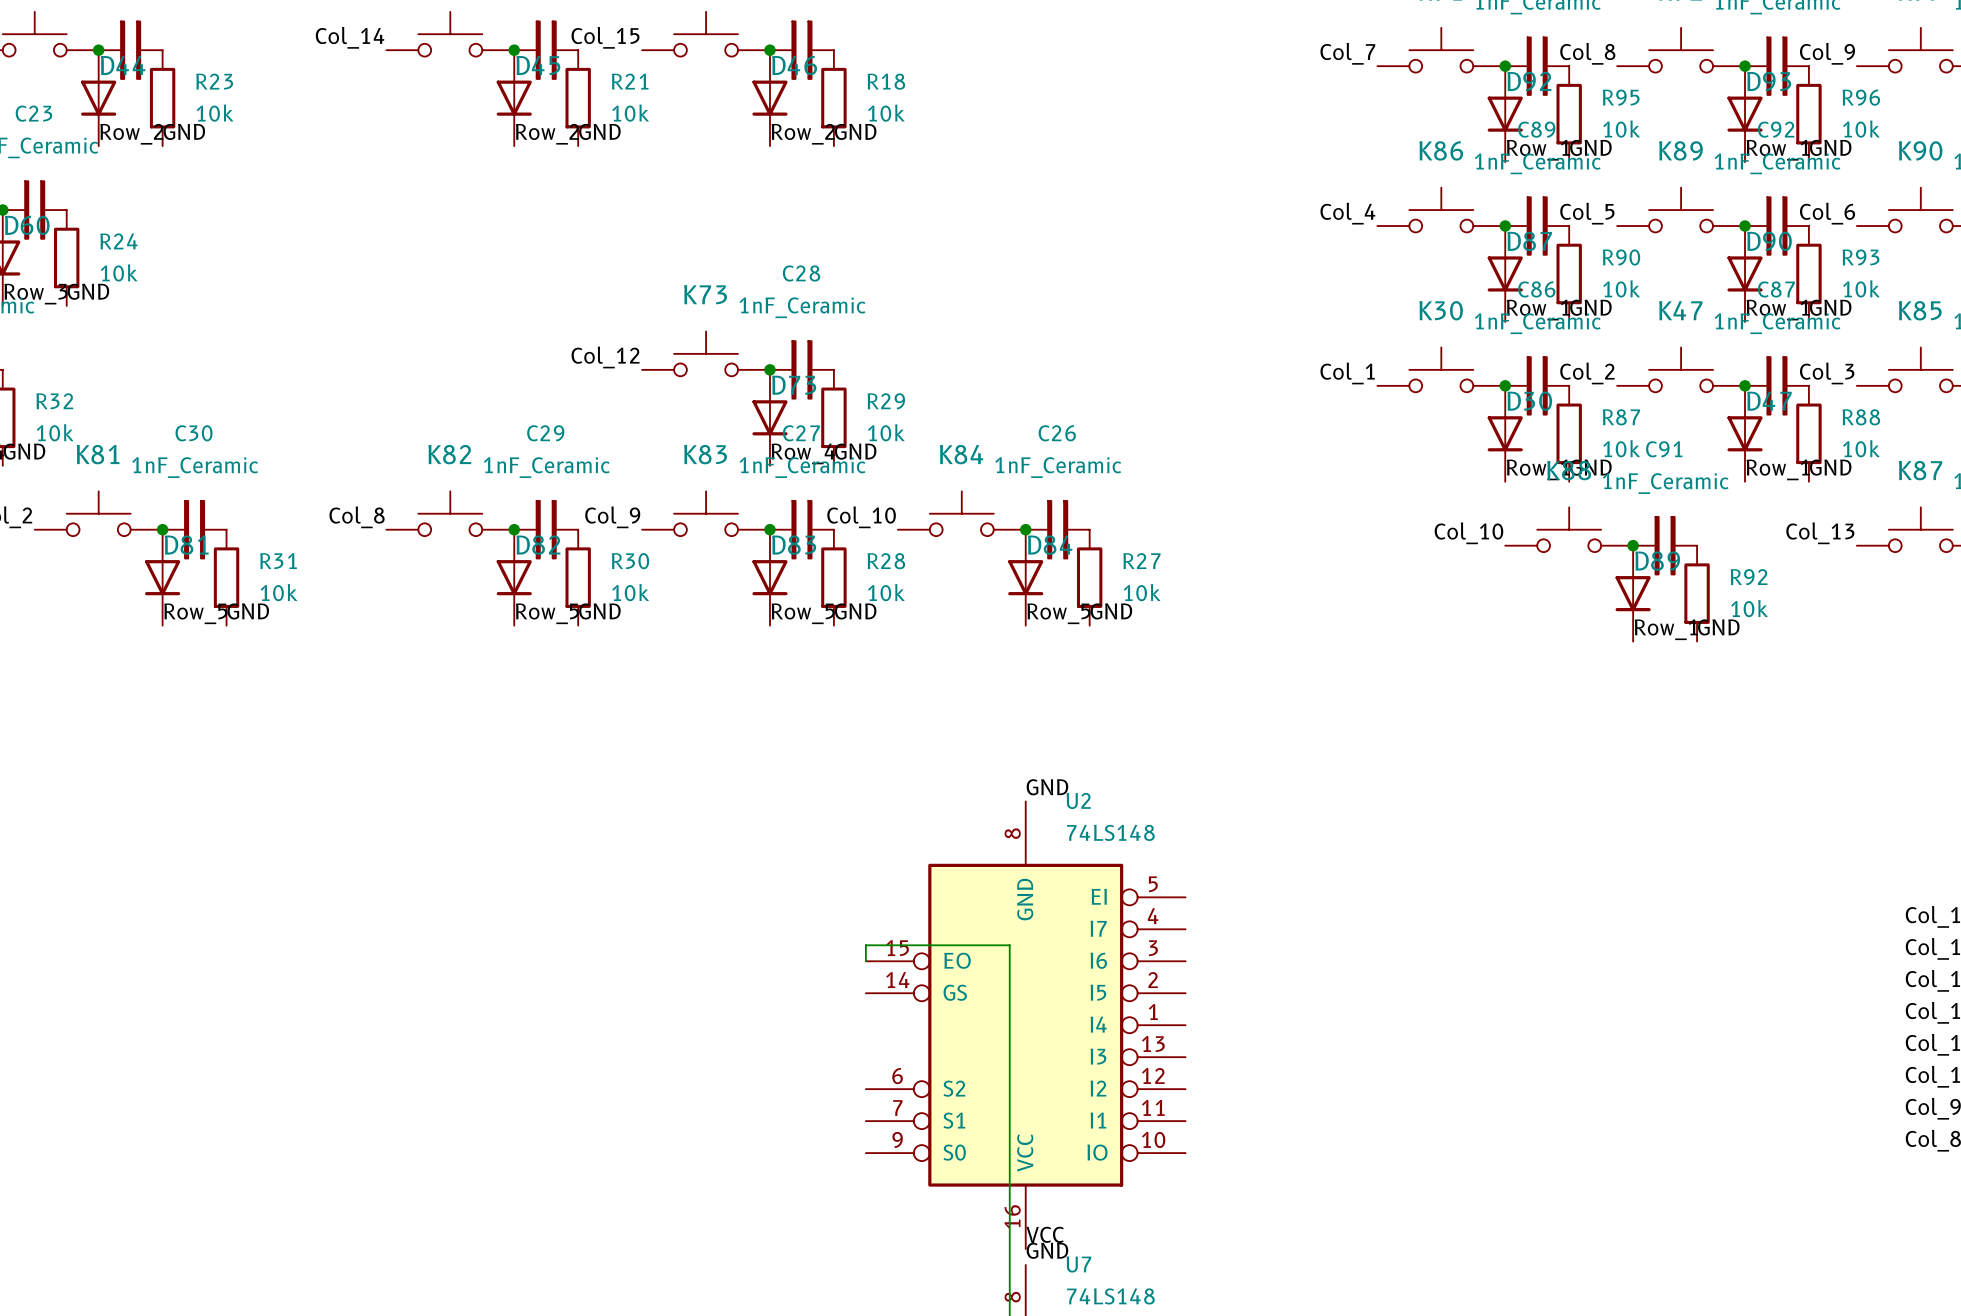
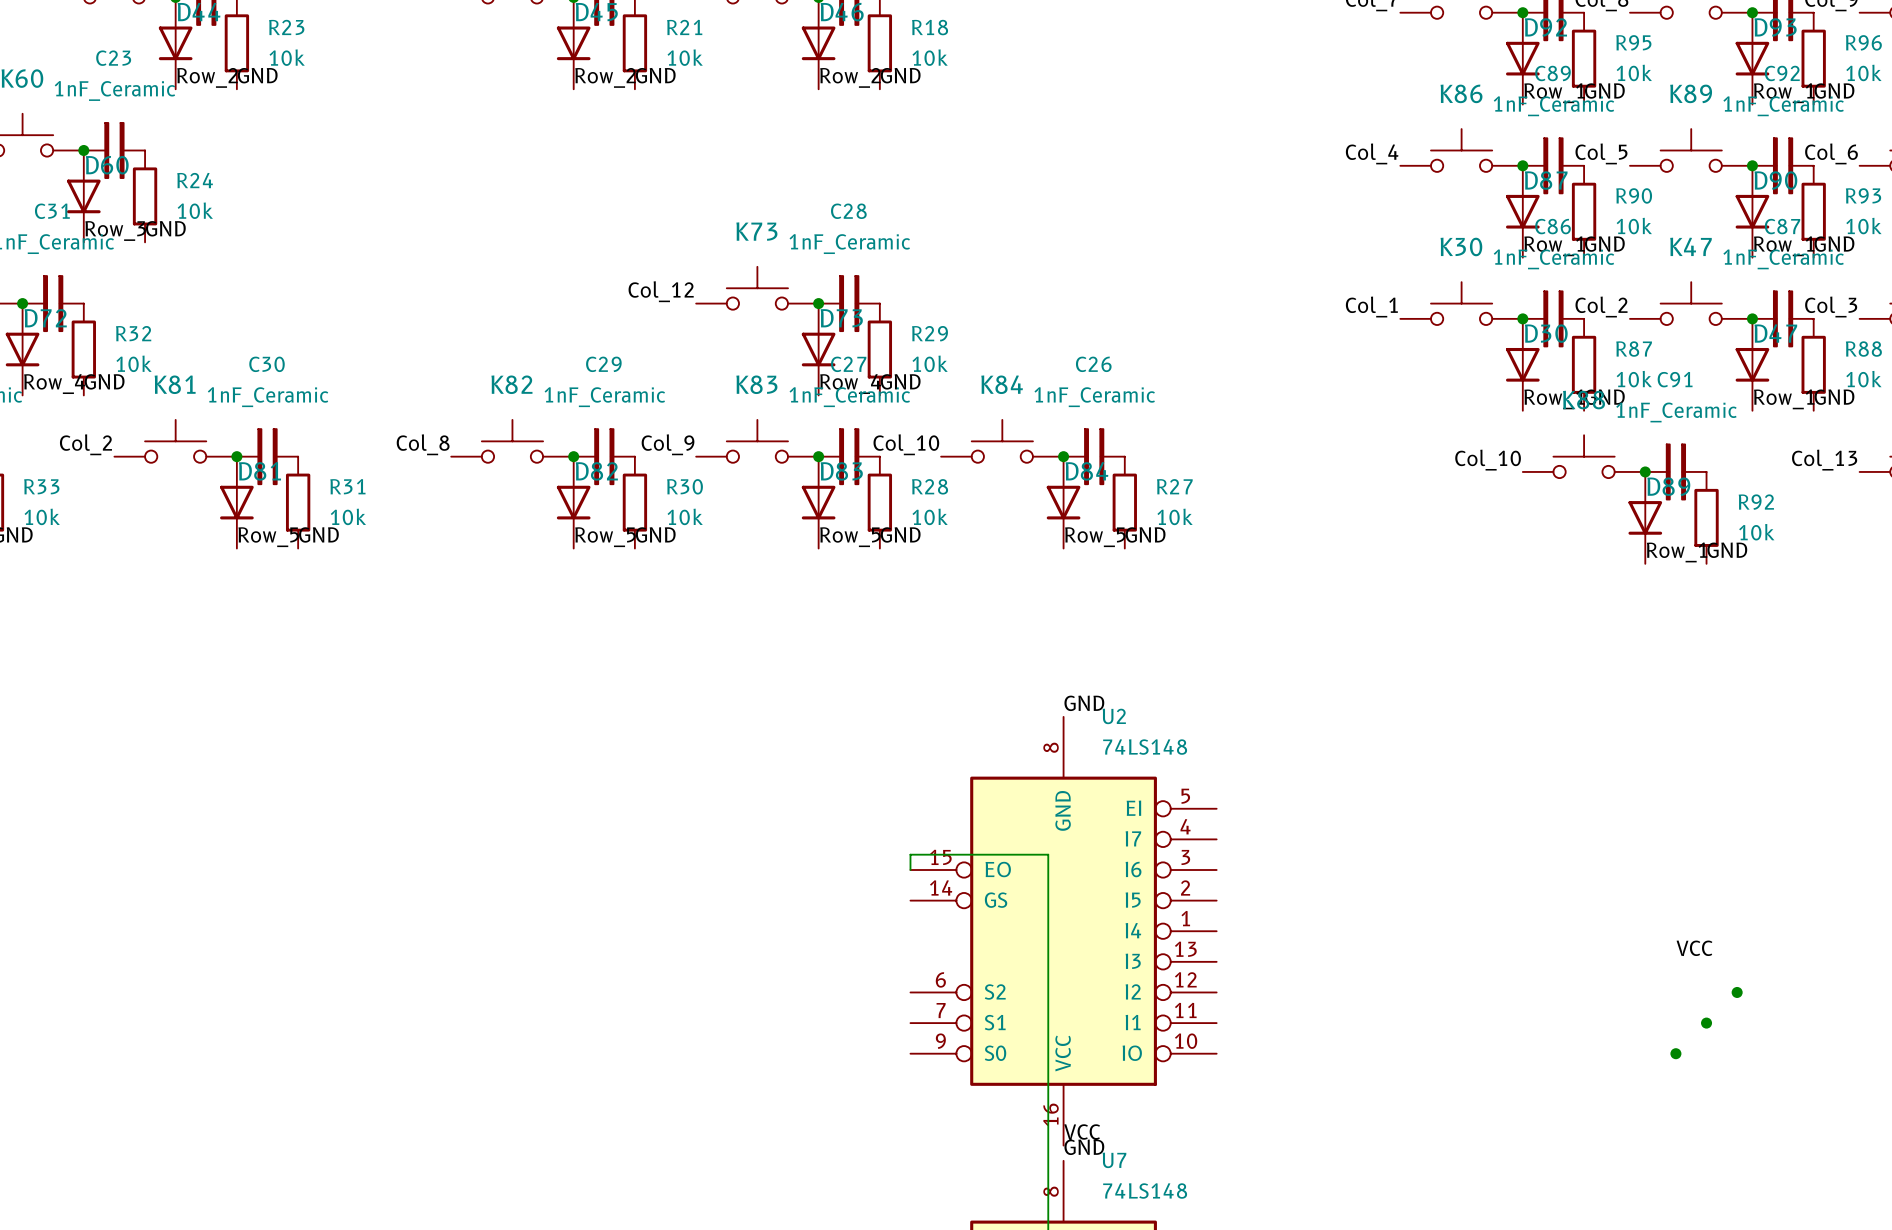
label: none -> VCC (1694, 948)
junction: none -> (1737, 992)
junction: none -> (1706, 1023)
junction: none -> (1675, 1053)

